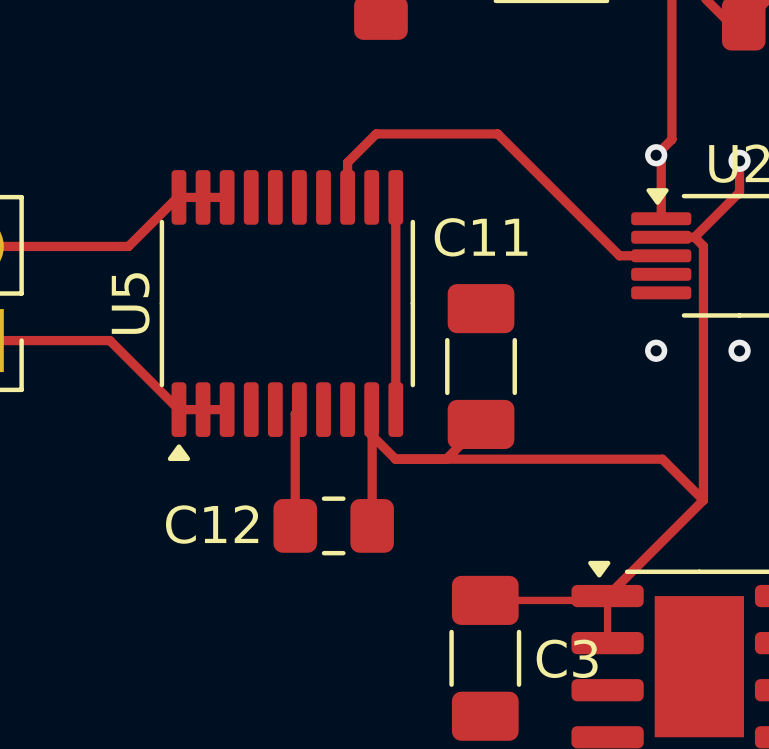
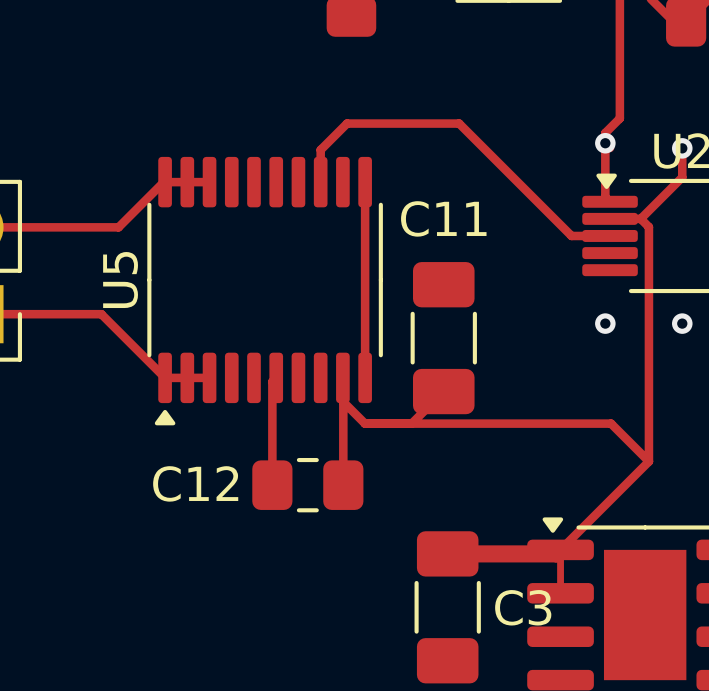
track: (671, 128) (671, 139) (656, 155) -> none
track: (661, 160) (661, 218) -> (619, 118) (605, 132) (605, 197) (610, 201)
track width: thin (607, 596) (603, 600) (485, 600) -> thick (560, 549) (556, 553) (447, 553)

